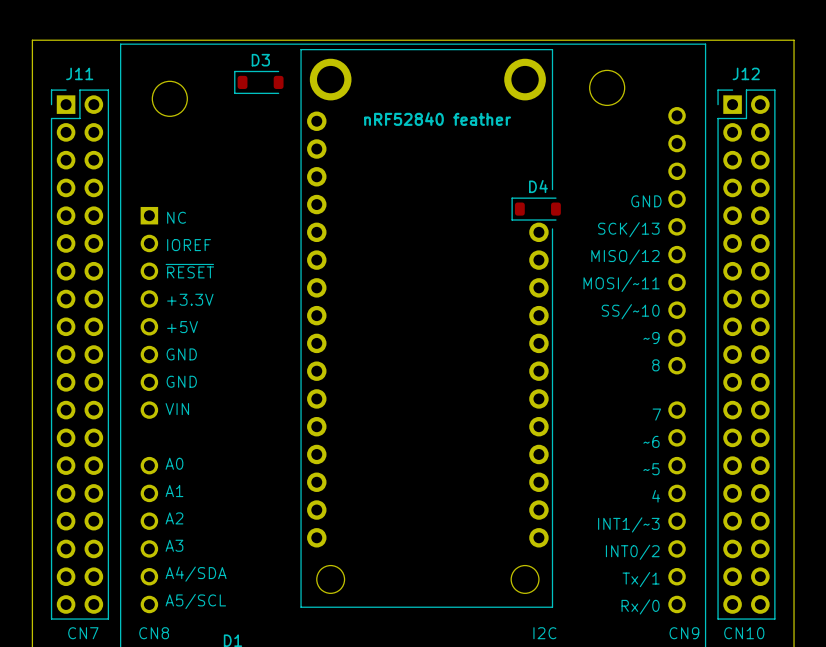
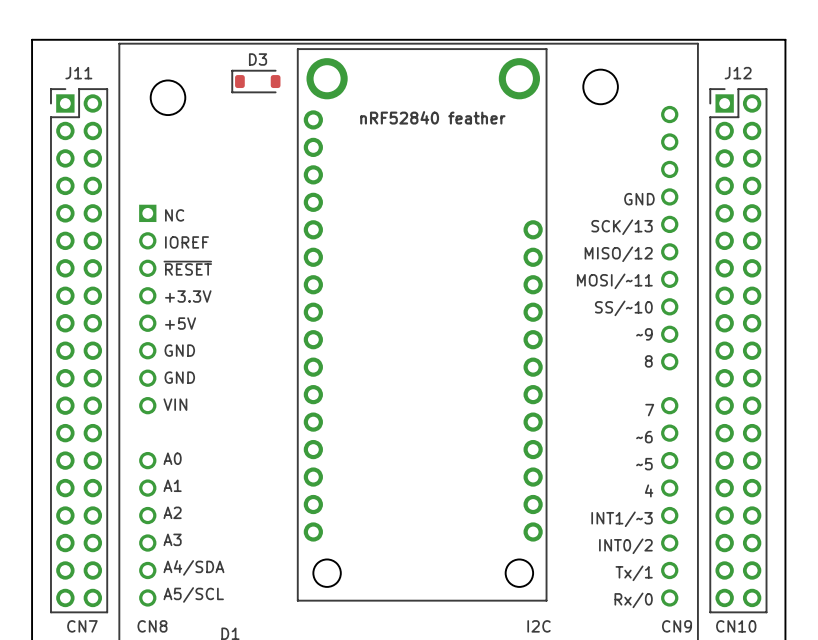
line: none -> (546, 187) (546, 226)
D4: (536, 209) -> none

